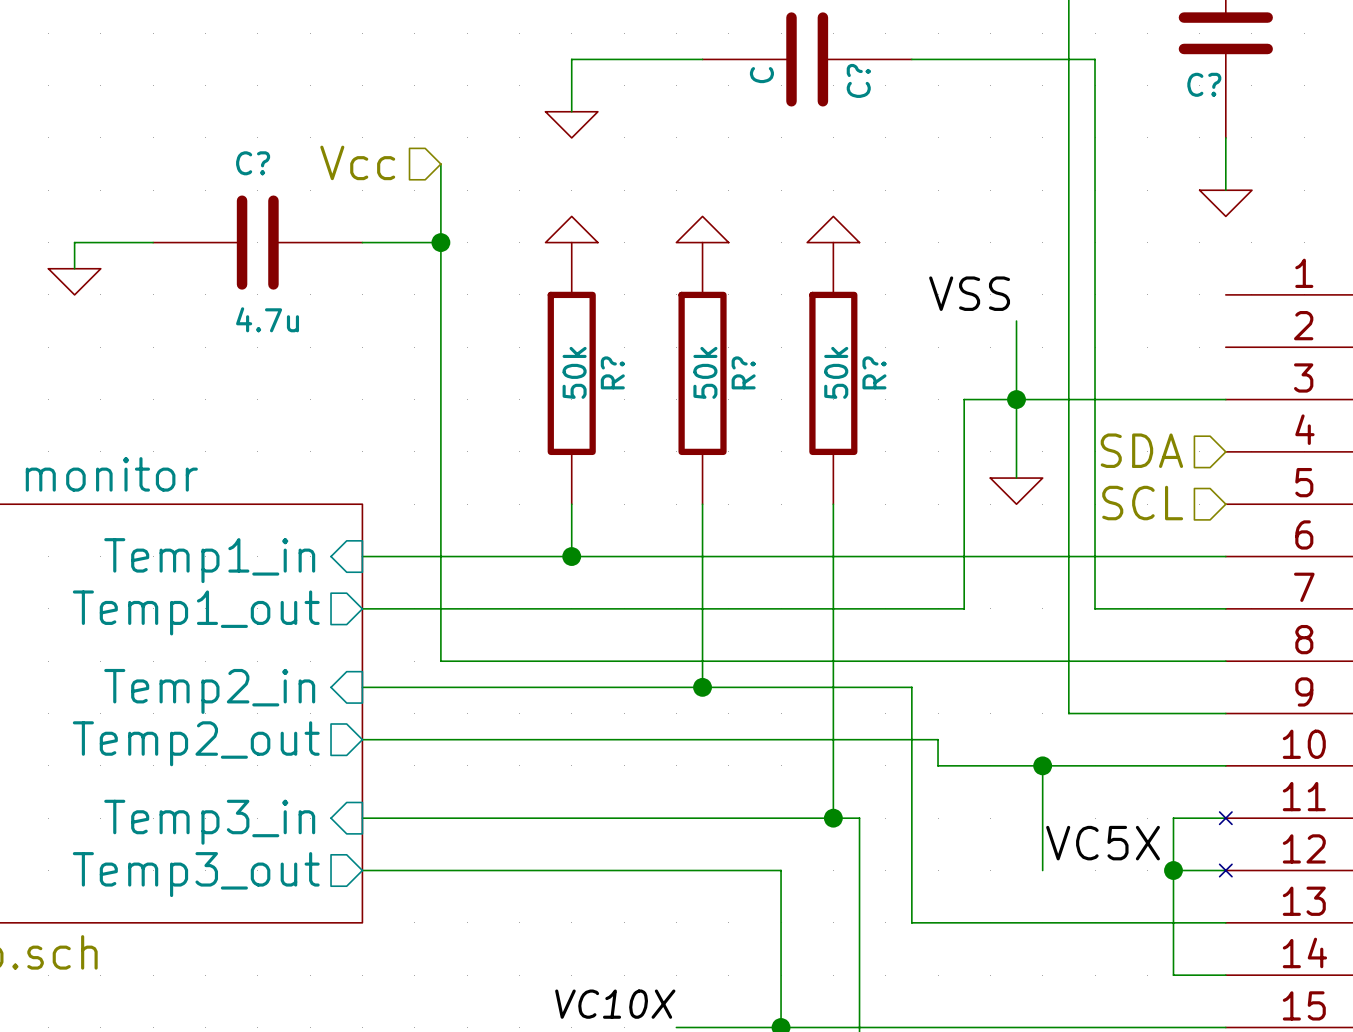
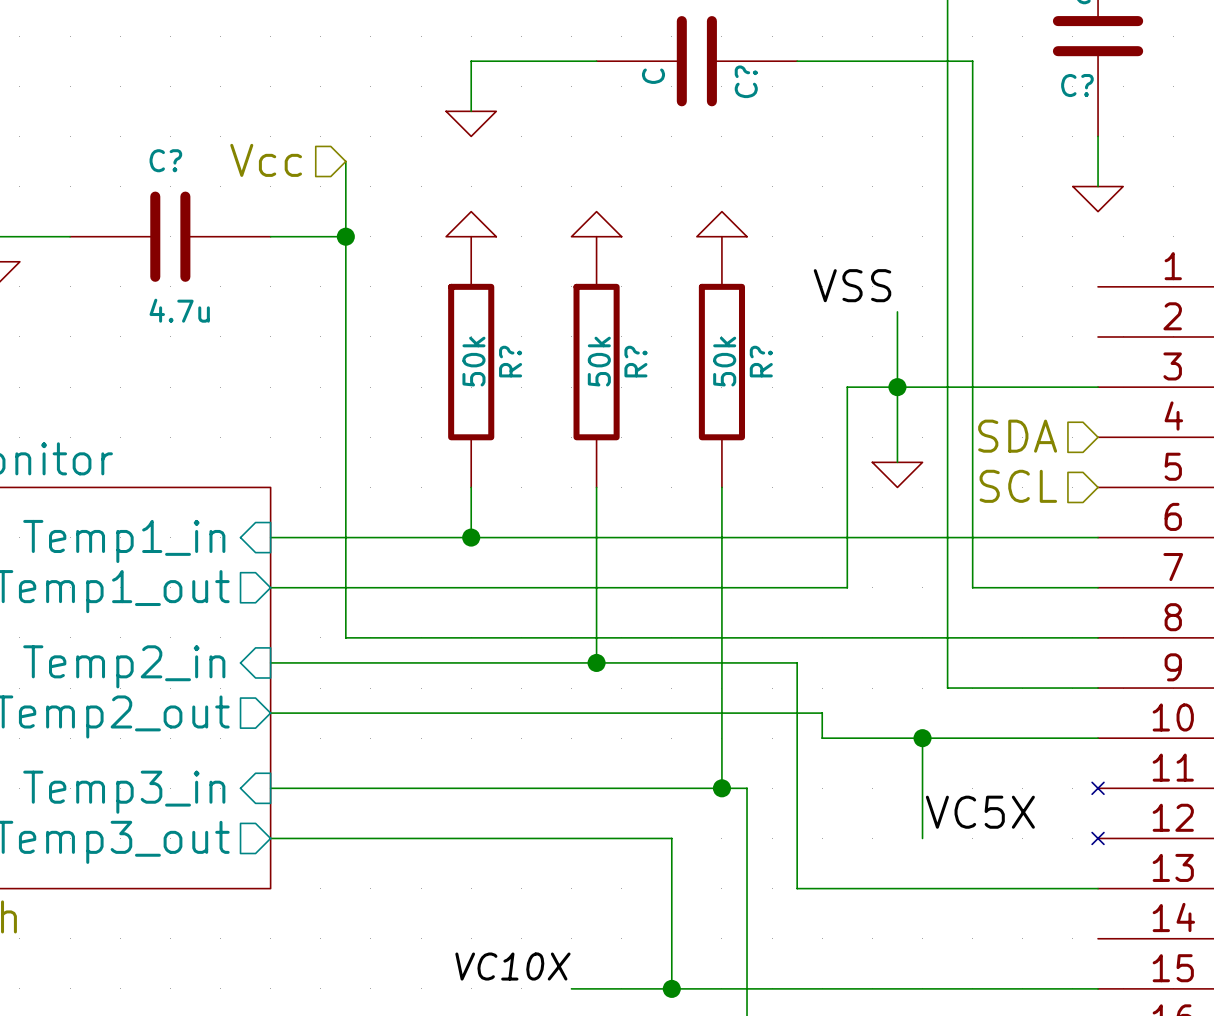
wire: (1225, 818) (1173, 818) (1173, 975) (1225, 975) -> none
wire: (1173, 870) (1225, 870) -> none
junction: (1173, 870) -> none

